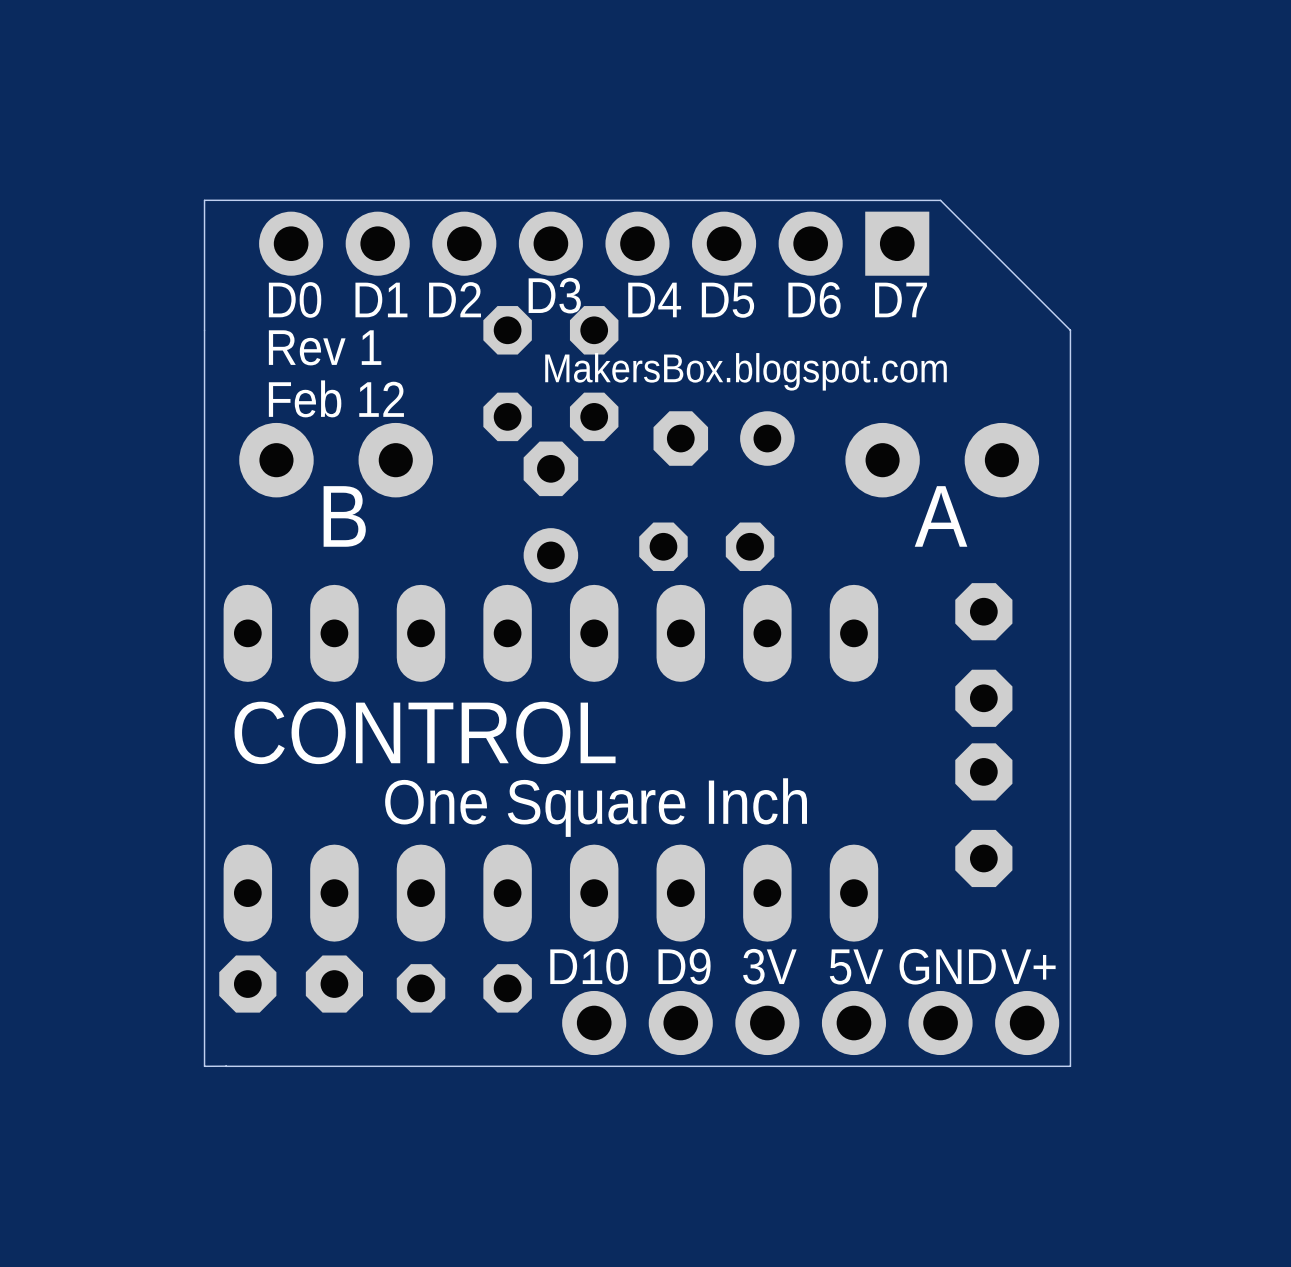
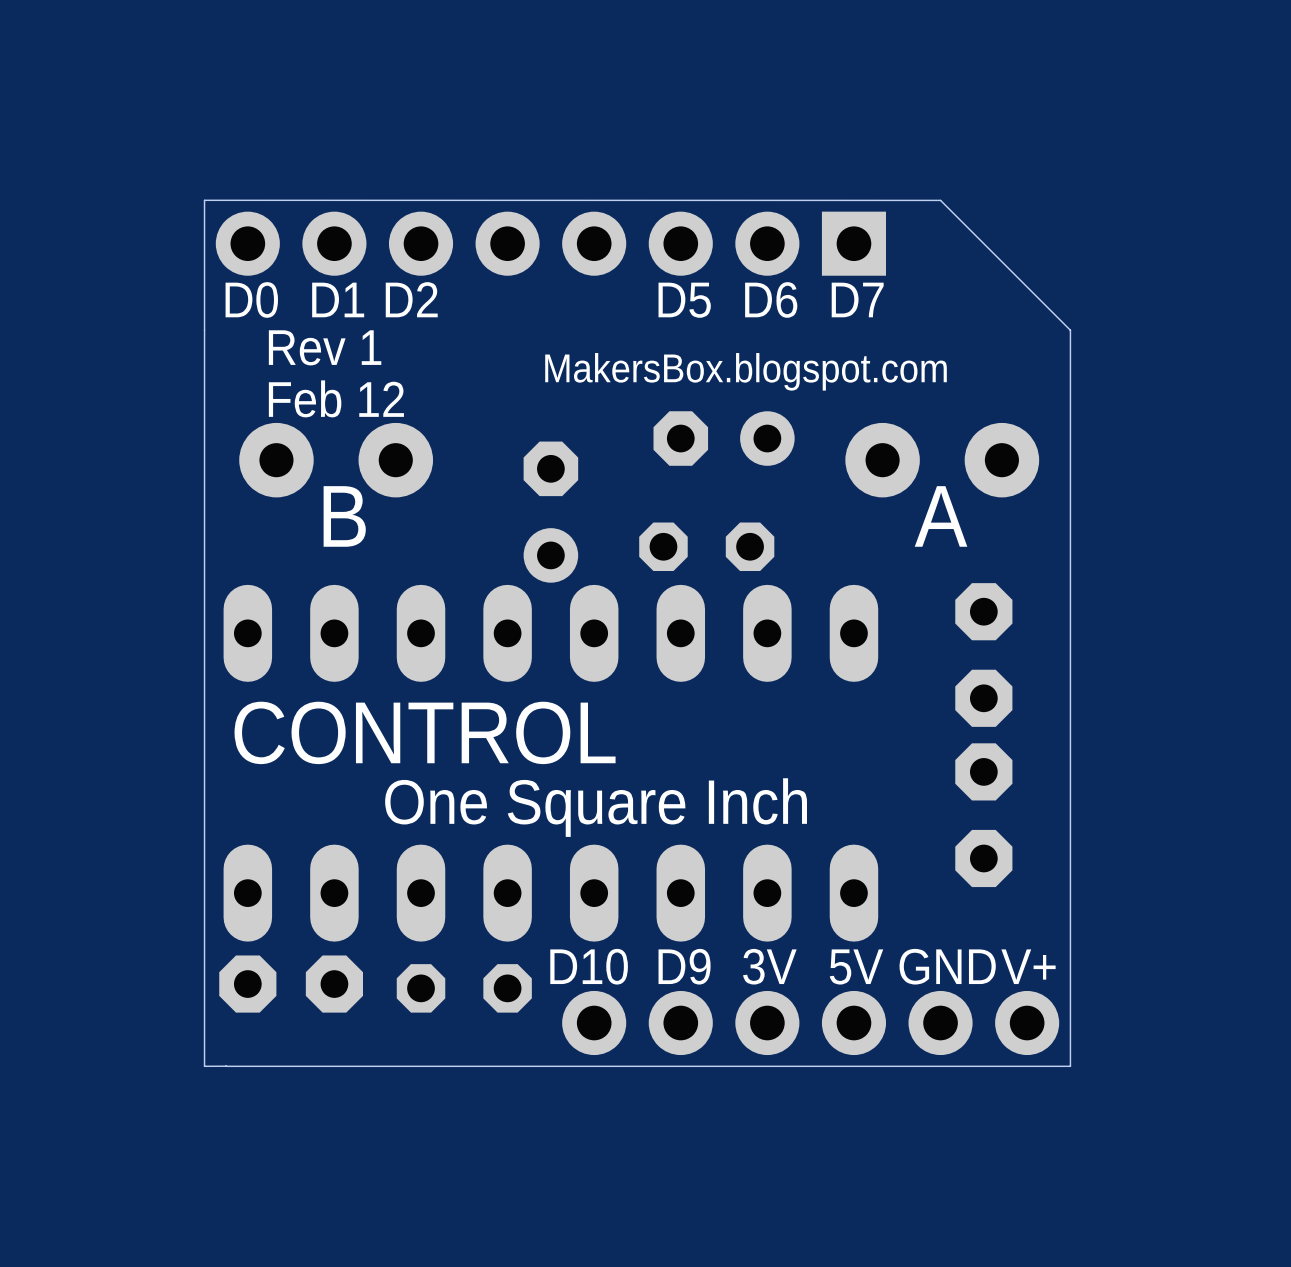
part position: (594, 243) -> (550, 243)
text: D3 (554, 295) -> none
text position: D0 (295, 299) -> D0 (251, 299)
text position: D1 (381, 299) -> D1 (338, 299)
text position: D2 (455, 299) -> D2 (411, 299)
text: D4 (654, 299) -> none
text position: D6 (814, 299) -> D6 (771, 299)
text position: D7 (900, 299) -> D7 (857, 299)
text position: D5 (727, 300) -> D5 (684, 300)
part: (507, 373) -> none
part: (594, 373) -> none

